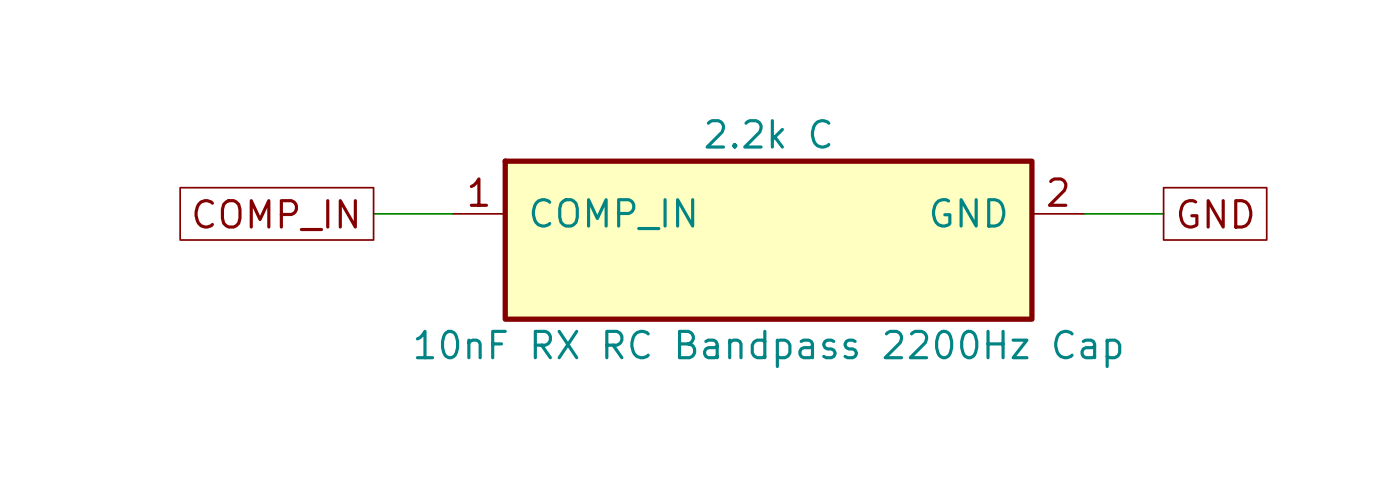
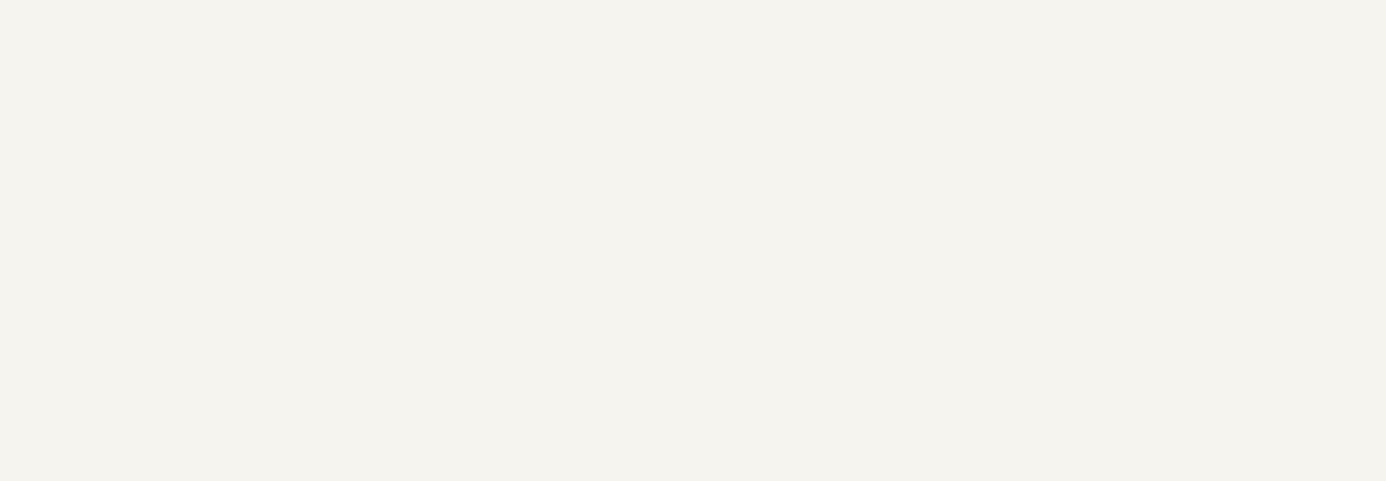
wire: (373, 213) (452, 213) -> none
wire: (1084, 213) (1163, 213) -> none
global label: GND (1215, 213) -> none
global label: COMP_IN (275, 215) -> none
2.2k C: 10nF RX RC Bandpass 2200Hz Cap (768, 240) -> none

